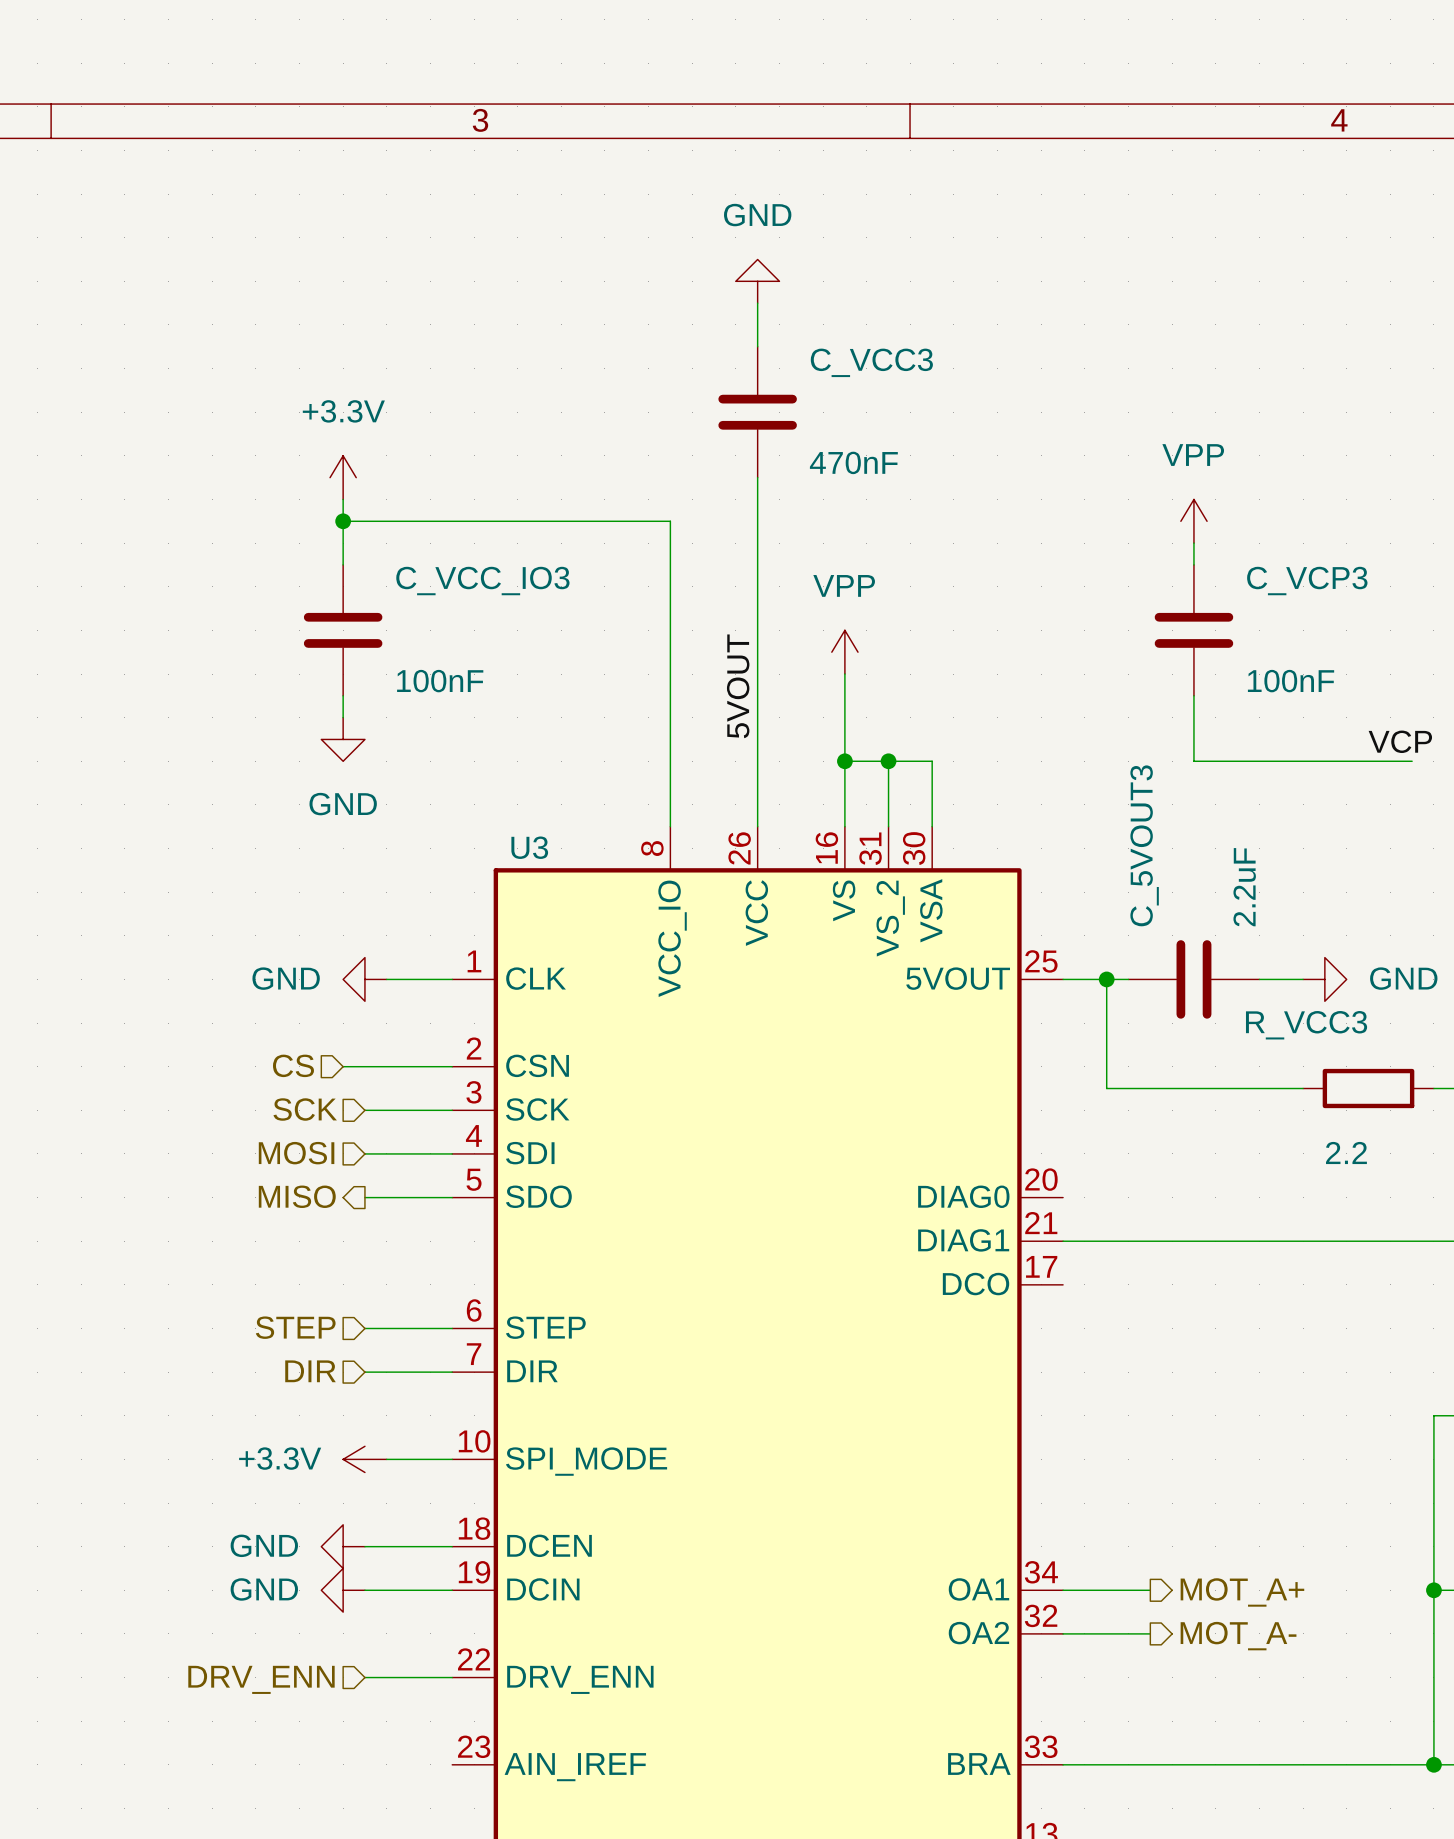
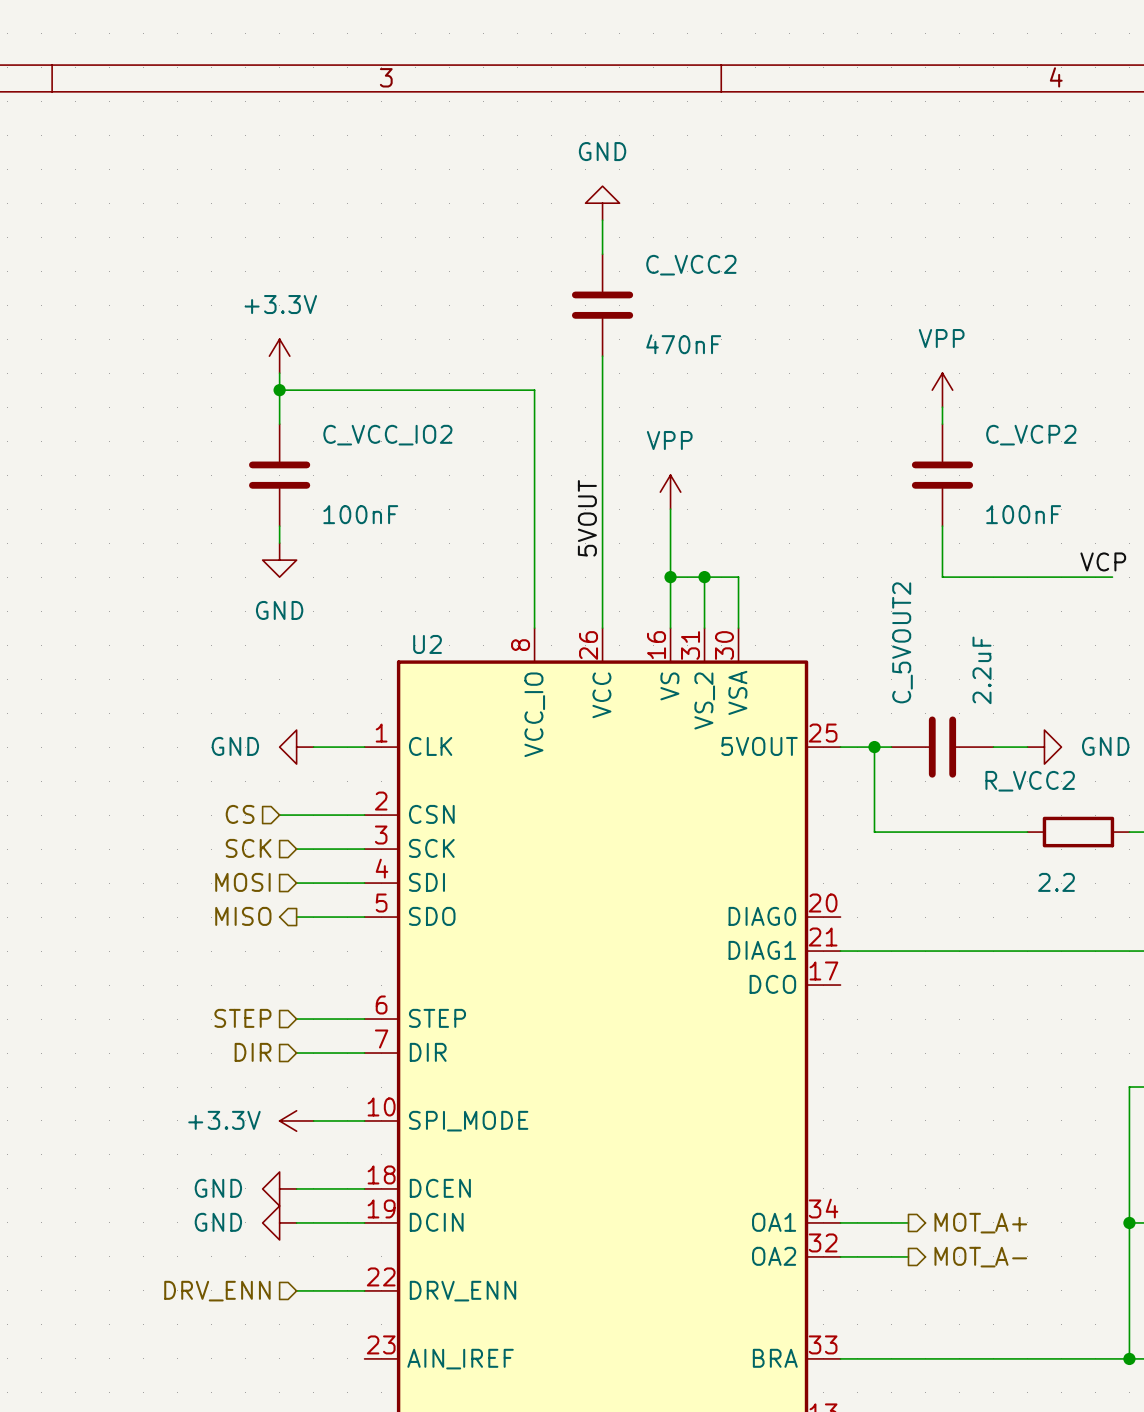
C_VCC3 name: C_VCC3 (871, 362) -> C_VCC2 (691, 265)
C_VCC_IO3 name: C_VCC_IO3 (482, 581) -> C_VCC_IO2 (387, 435)
C_VCP3 name: C_VCP3 (1307, 581) -> C_VCP2 (1031, 435)
C_5VOUT3 name: C_5VOUT3 (1144, 845) -> C_5VOUT2 (902, 642)
U3 name: U3 (529, 847) -> U2 (427, 644)
R_VCC3 name: R_VCC3 (1306, 1025) -> R_VCC2 (1030, 781)

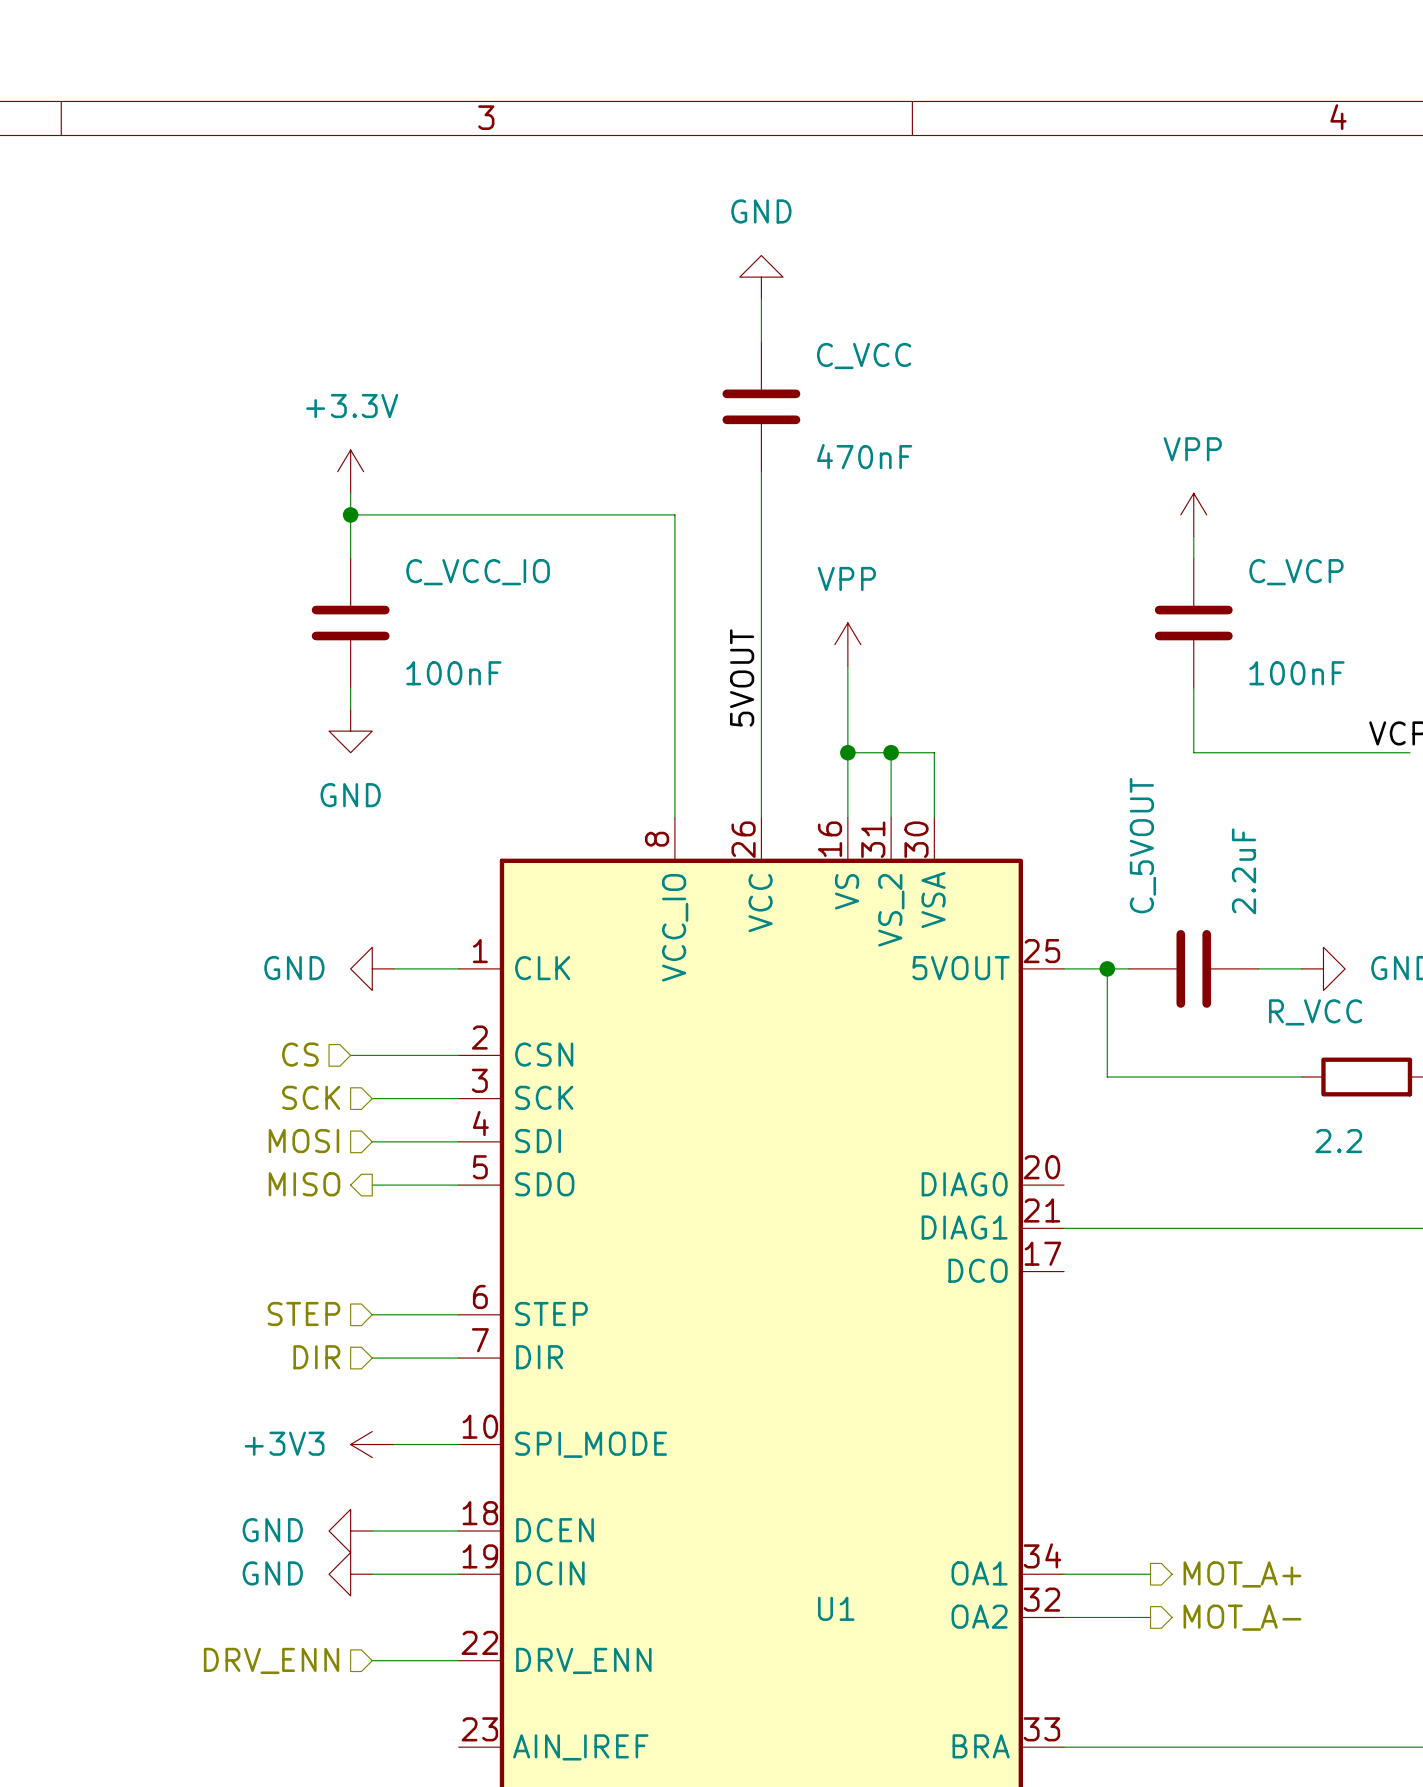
C_VCC2 name: C_VCC2 (691, 265) -> C_VCC (864, 355)
C_VCC_IO2 name: C_VCC_IO2 (387, 435) -> C_VCC_IO (478, 572)
C_VCP2 name: C_VCP2 (1031, 435) -> C_VCP (1296, 572)
C_5VOUT2 name: C_5VOUT2 (902, 642) -> C_5VOUT (1142, 845)
U2 name: U2 (427, 644) -> U1 (836, 1608)
R_VCC2 name: R_VCC2 (1030, 781) -> R_VCC (1315, 1012)
power symbol: +3.3V (296, 1120) -> +3V3 (372, 1444)

